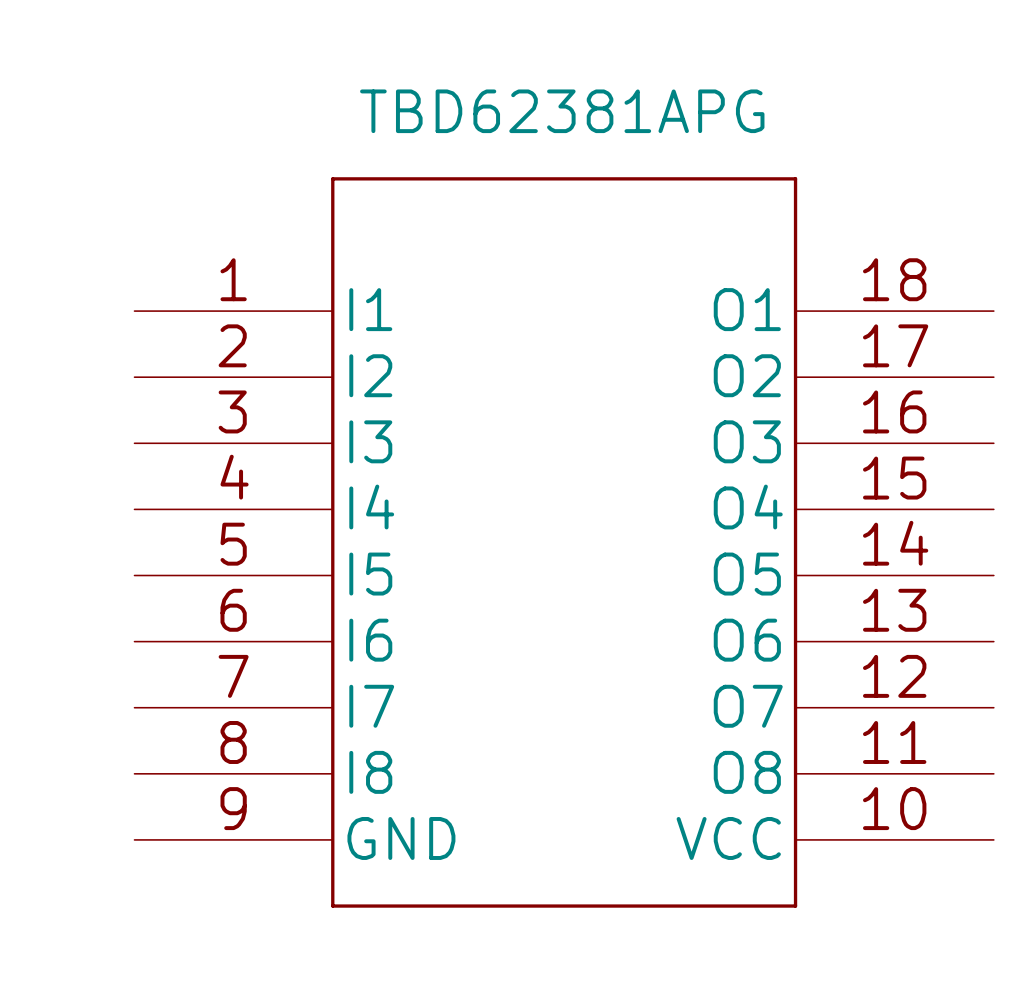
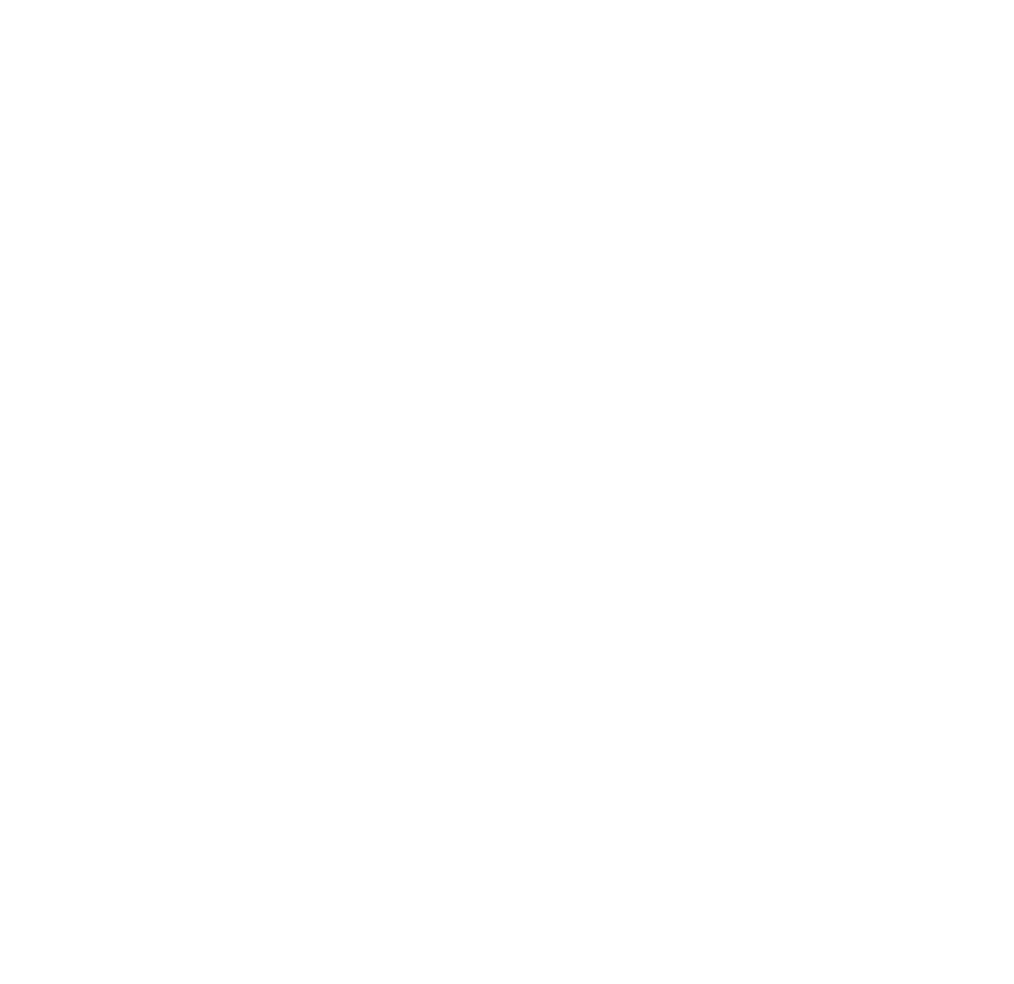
part: TBD62381APG (564, 542) -> none

